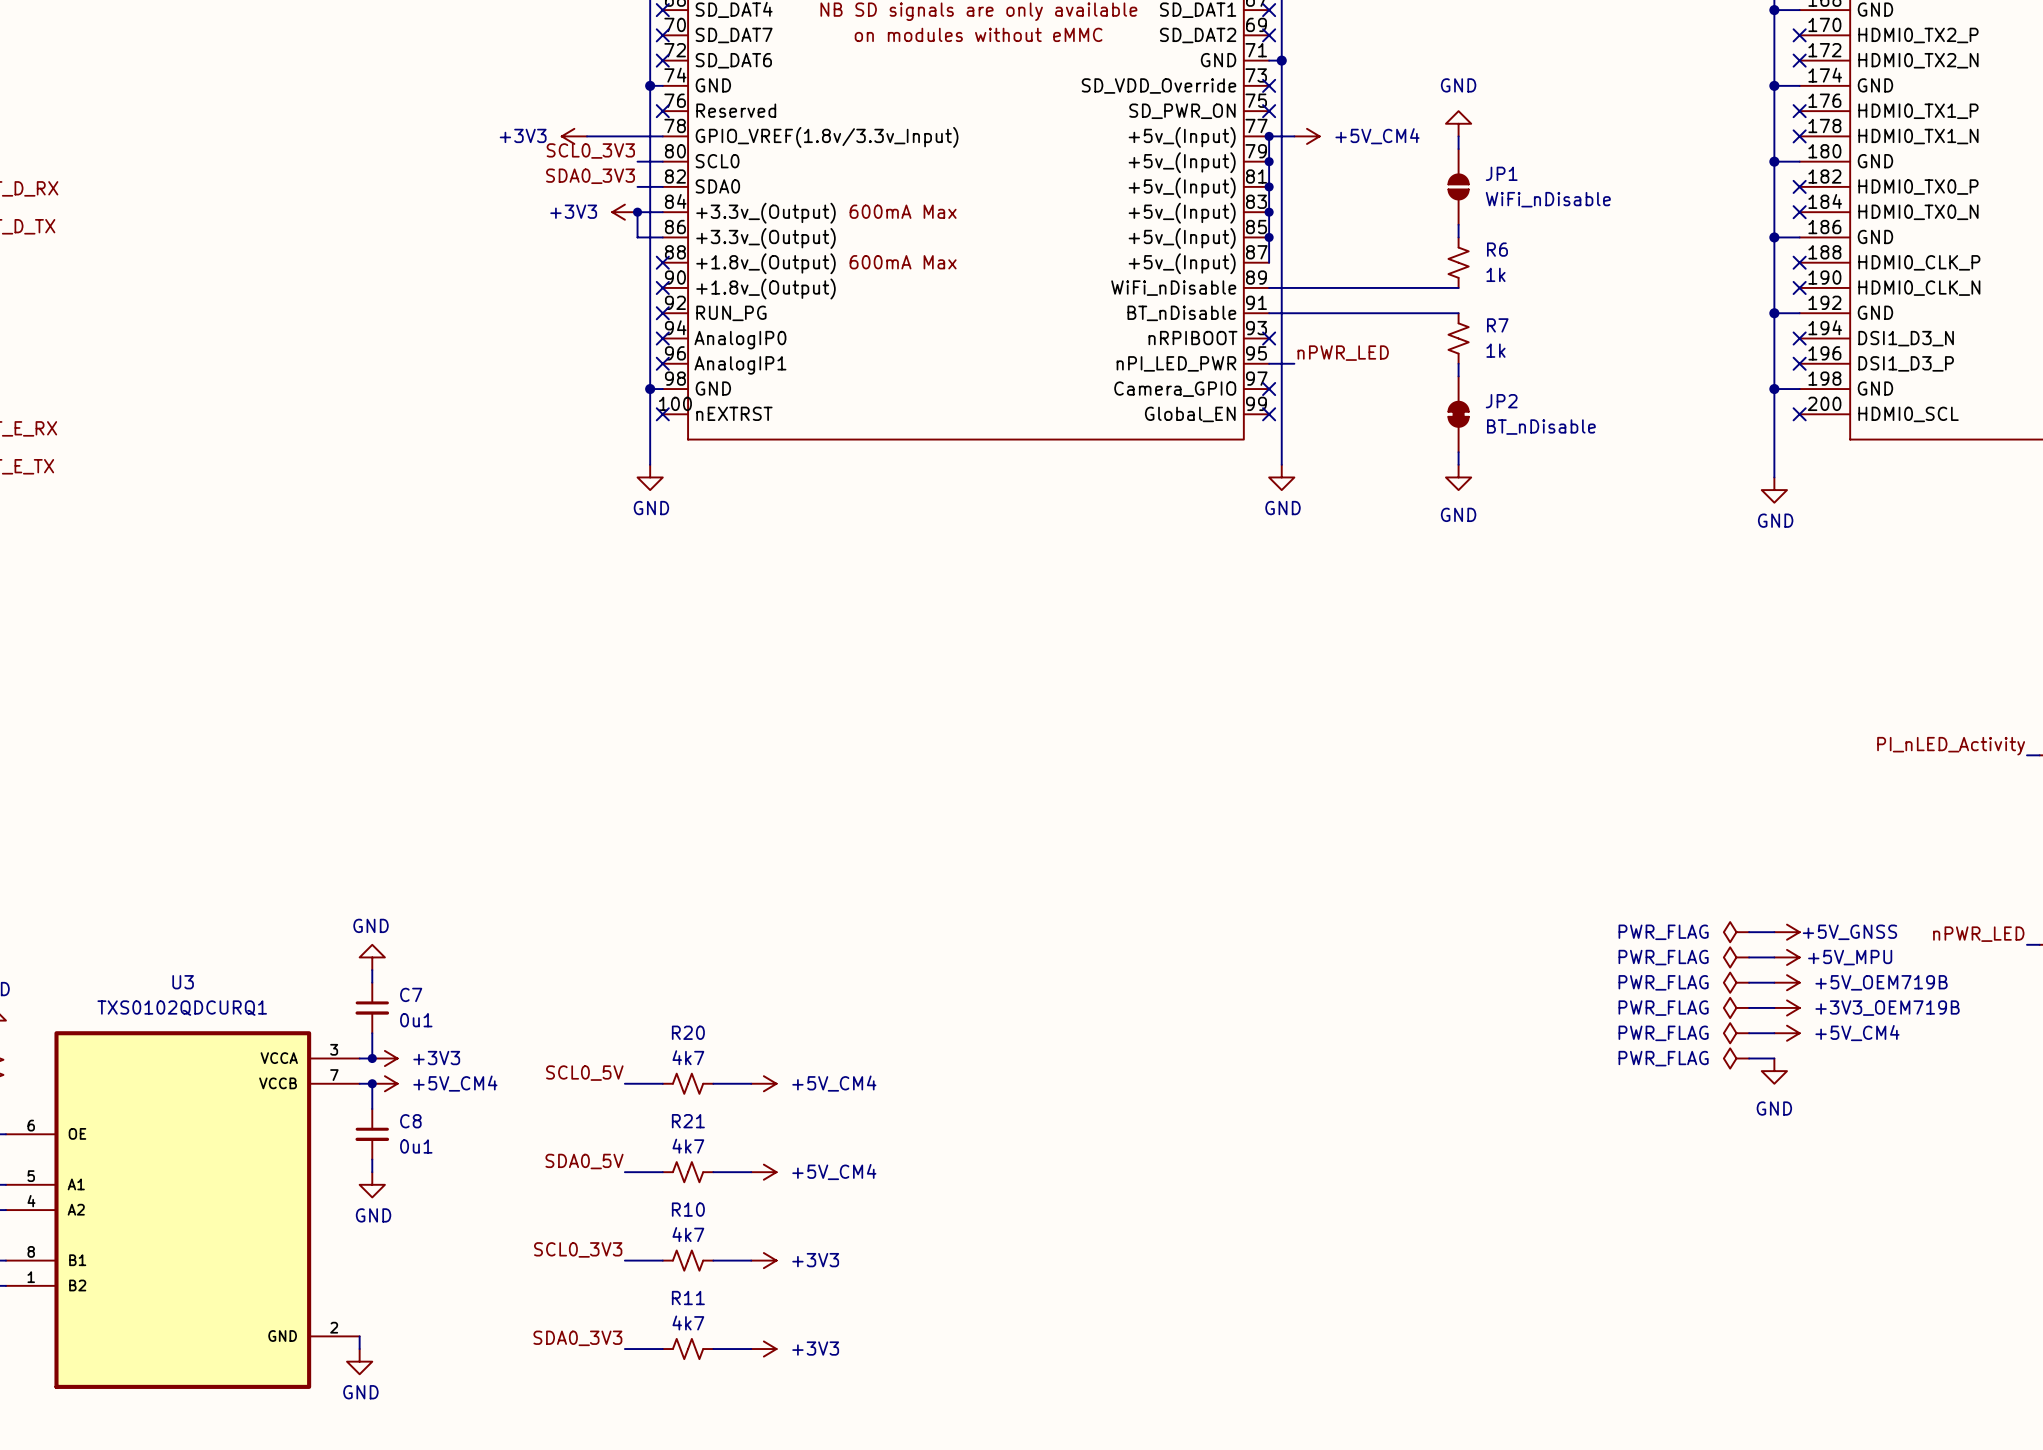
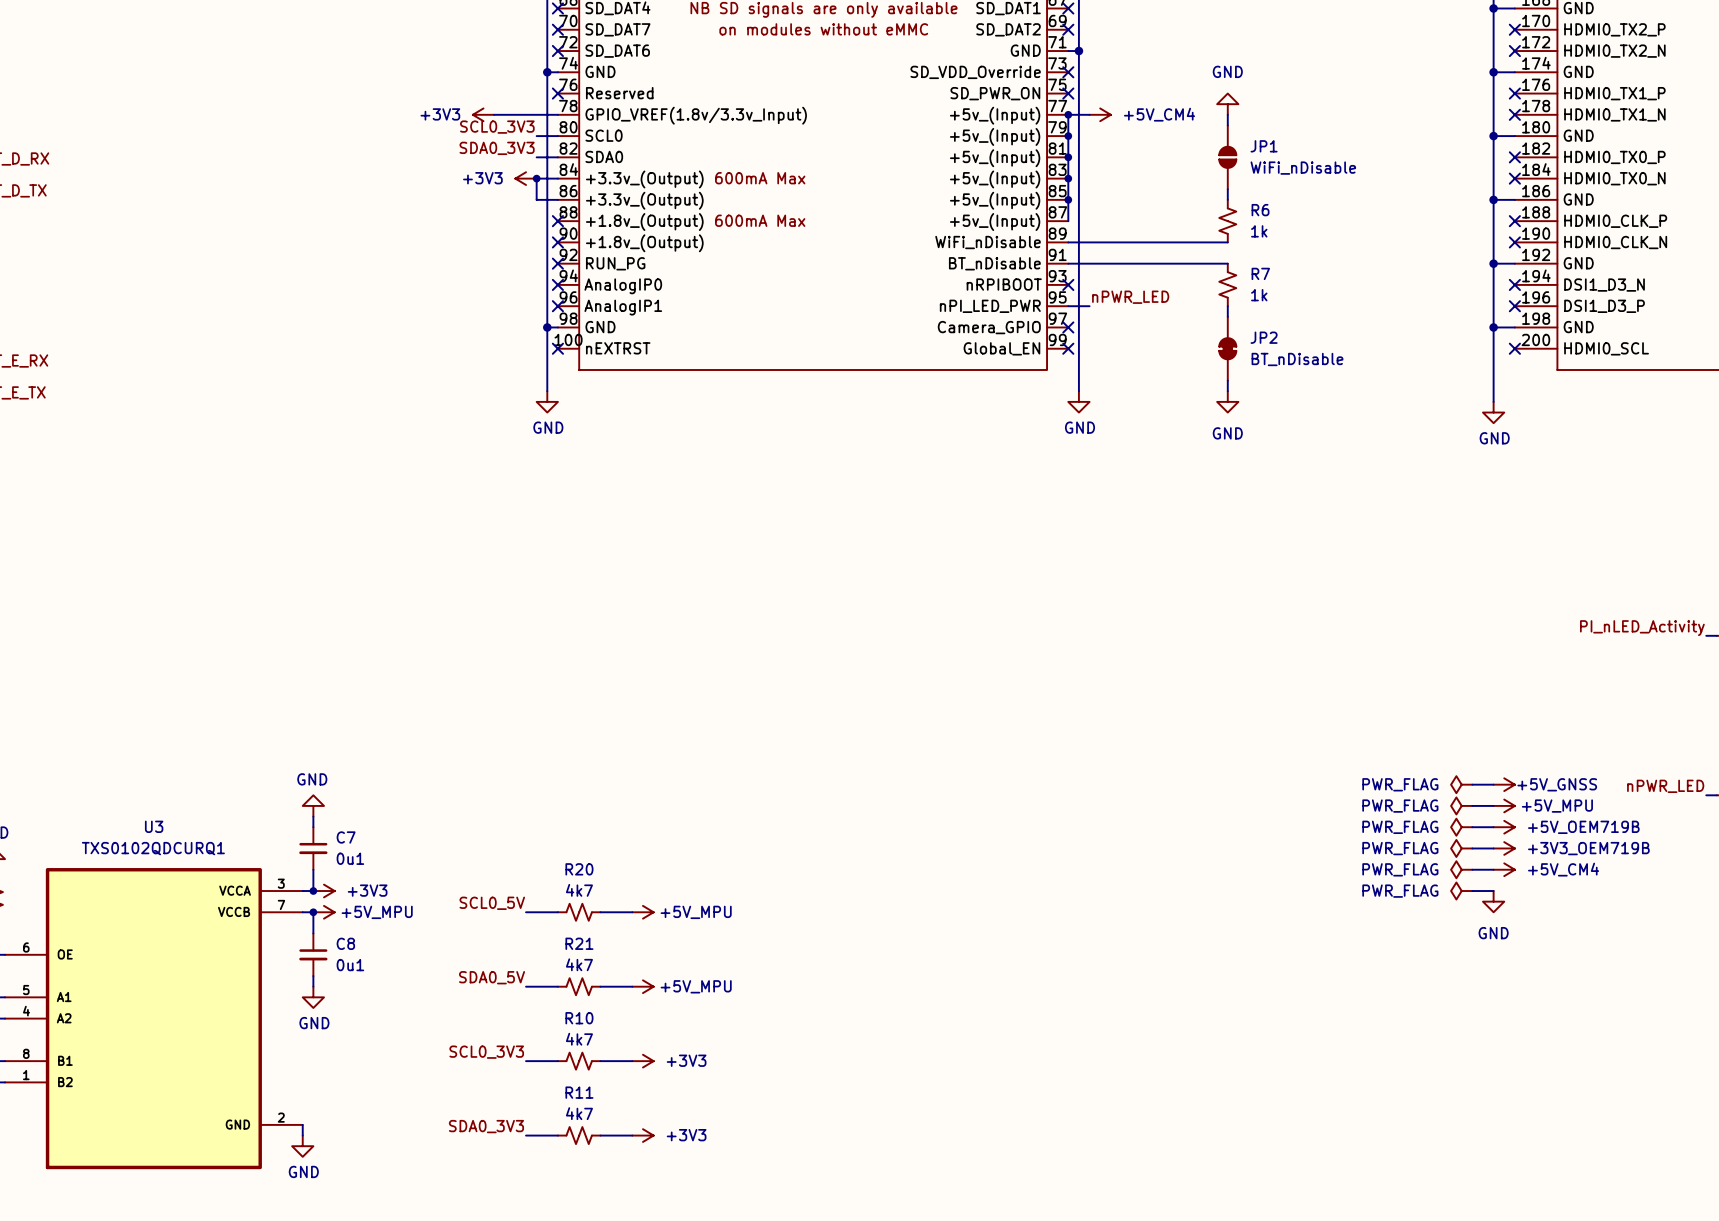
power symbol: +5V_CM4 (384, 1083) -> +5V_MPU (324, 912)
power symbol: +5V_CM4 (763, 1083) -> +5V_MPU (642, 912)
power symbol: +5V_CM4 (763, 1172) -> +5V_MPU (642, 986)

